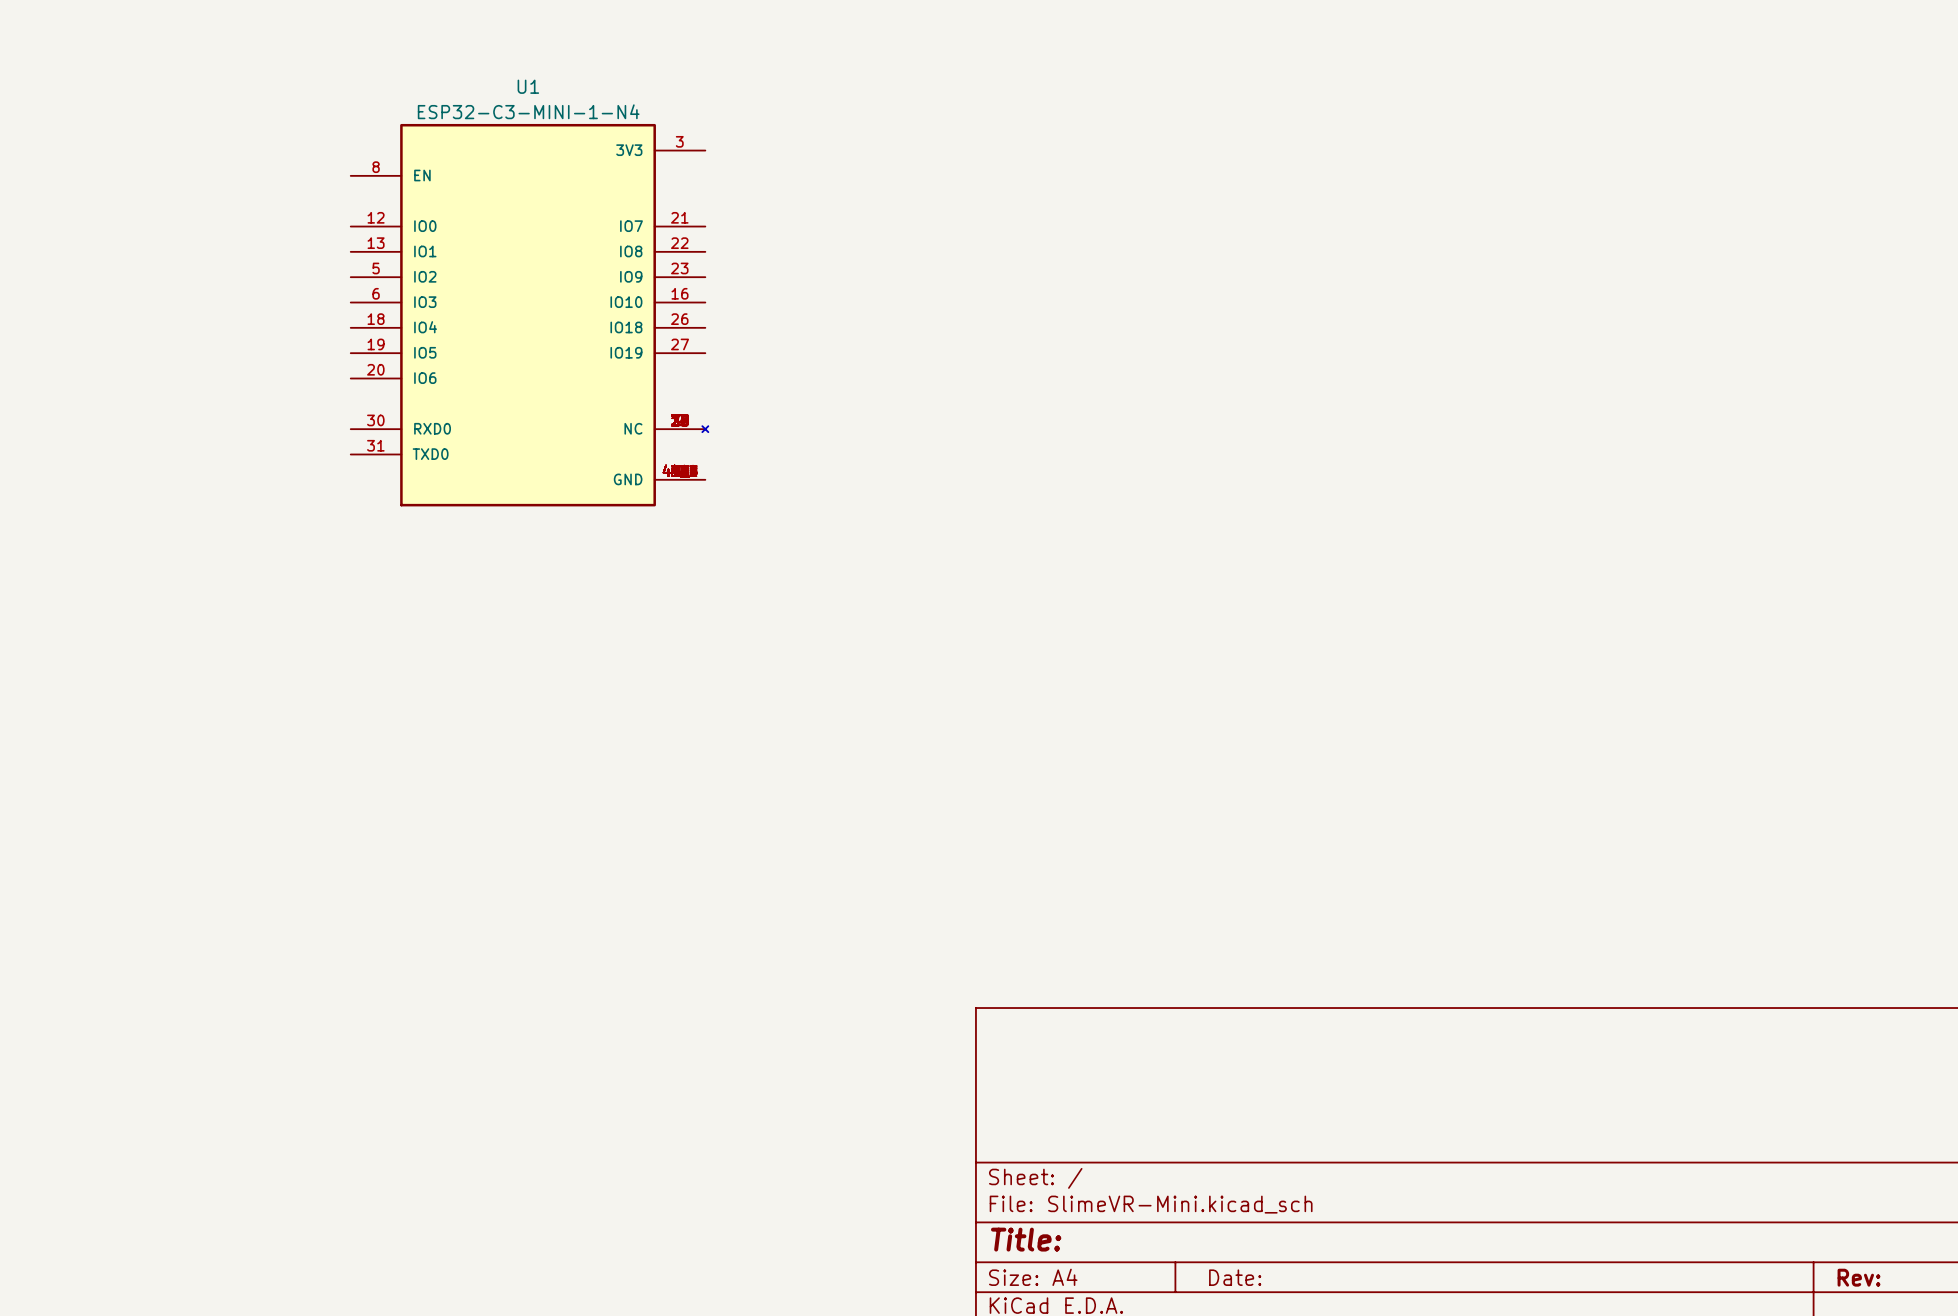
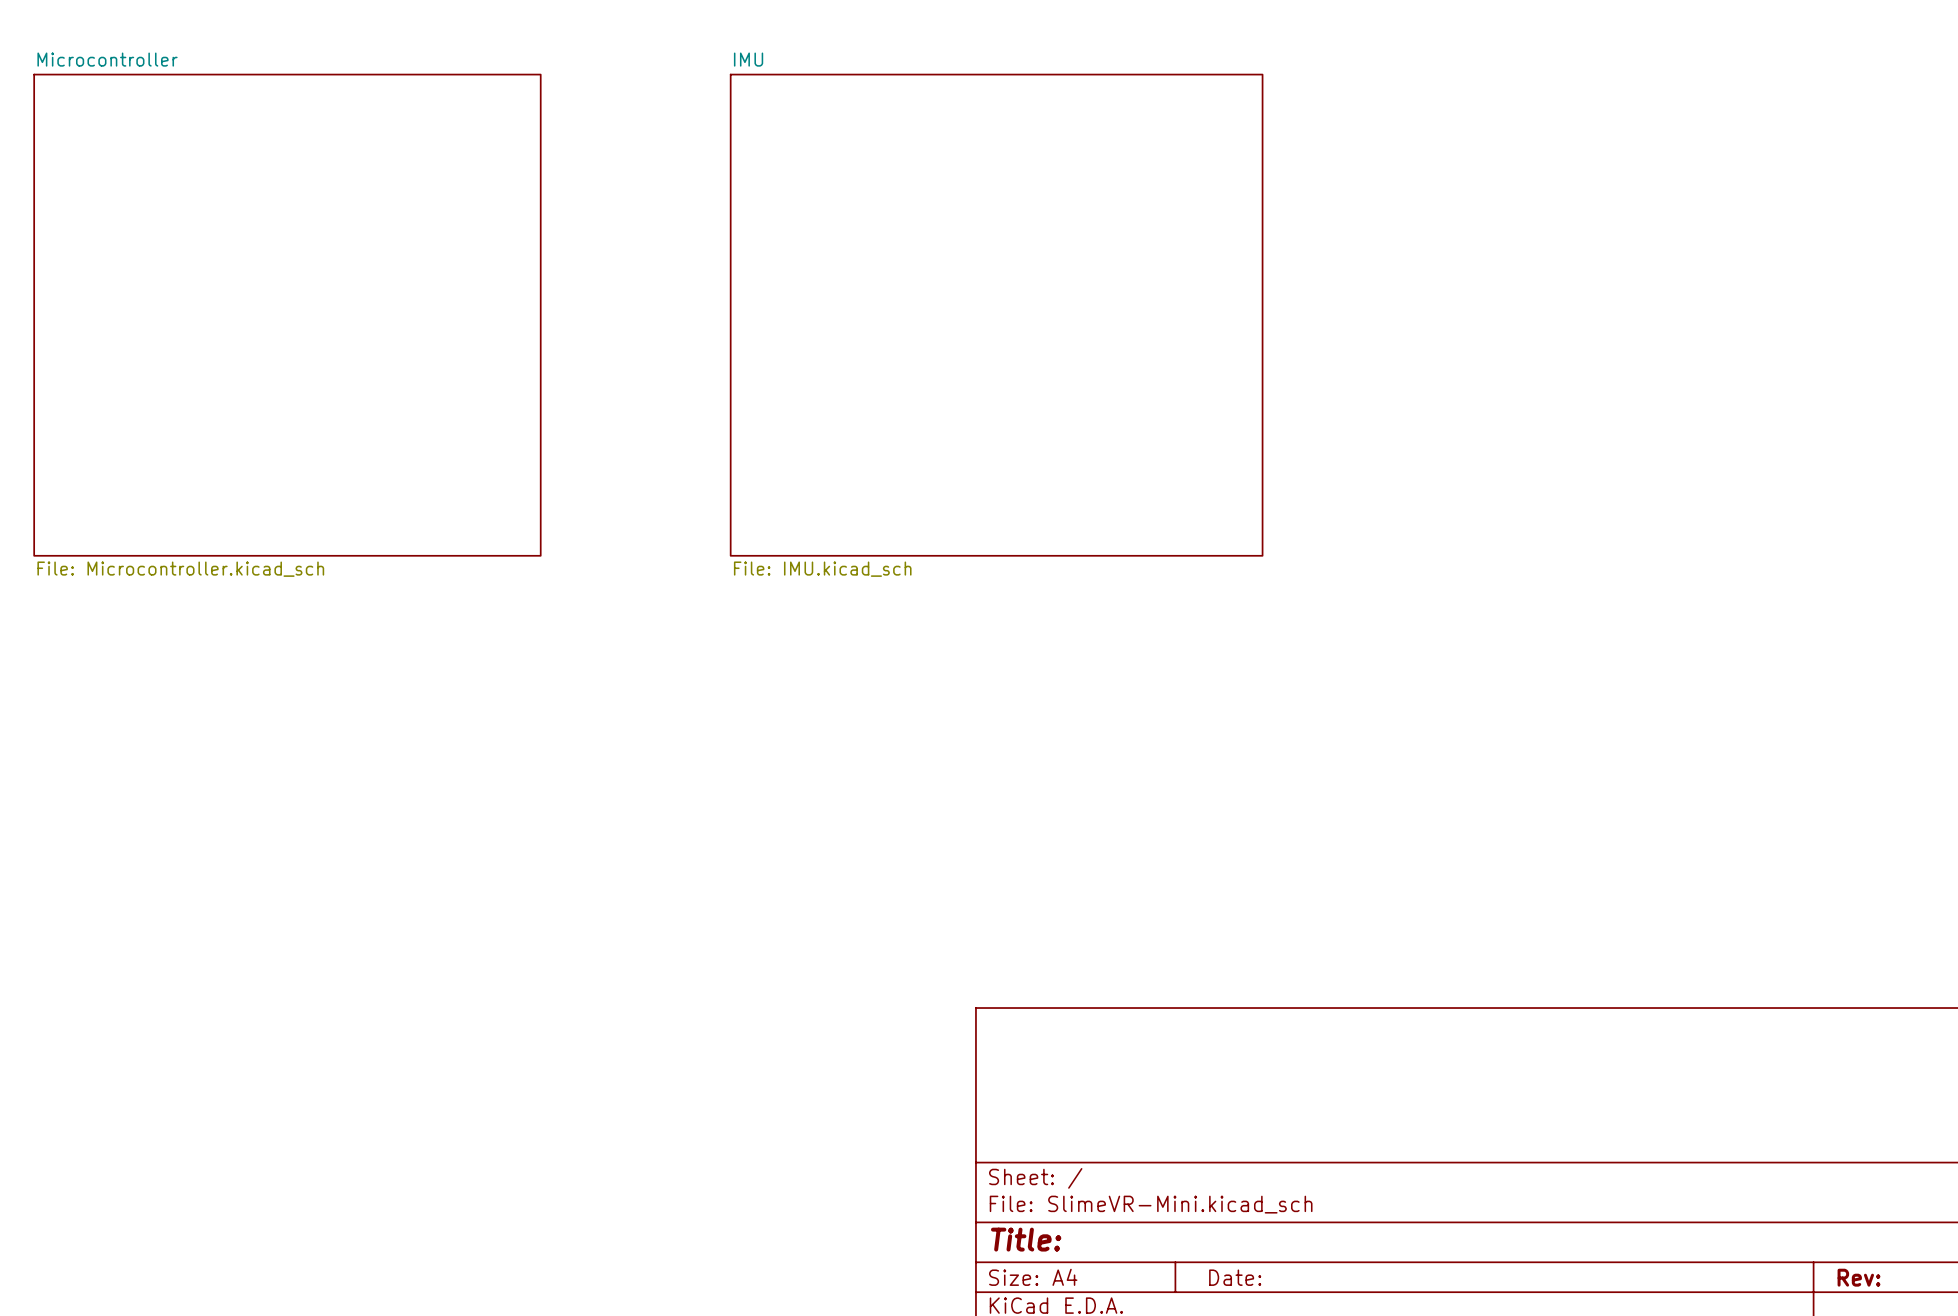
sheet Microcontroller: none -> File: Microcontroller.kicad_sch (287, 315)
U1: ESP32-C3-MINI-1-N4 (529, 315) -> none
sheet IMU: none -> File: IMU.kicad_sch (996, 315)

